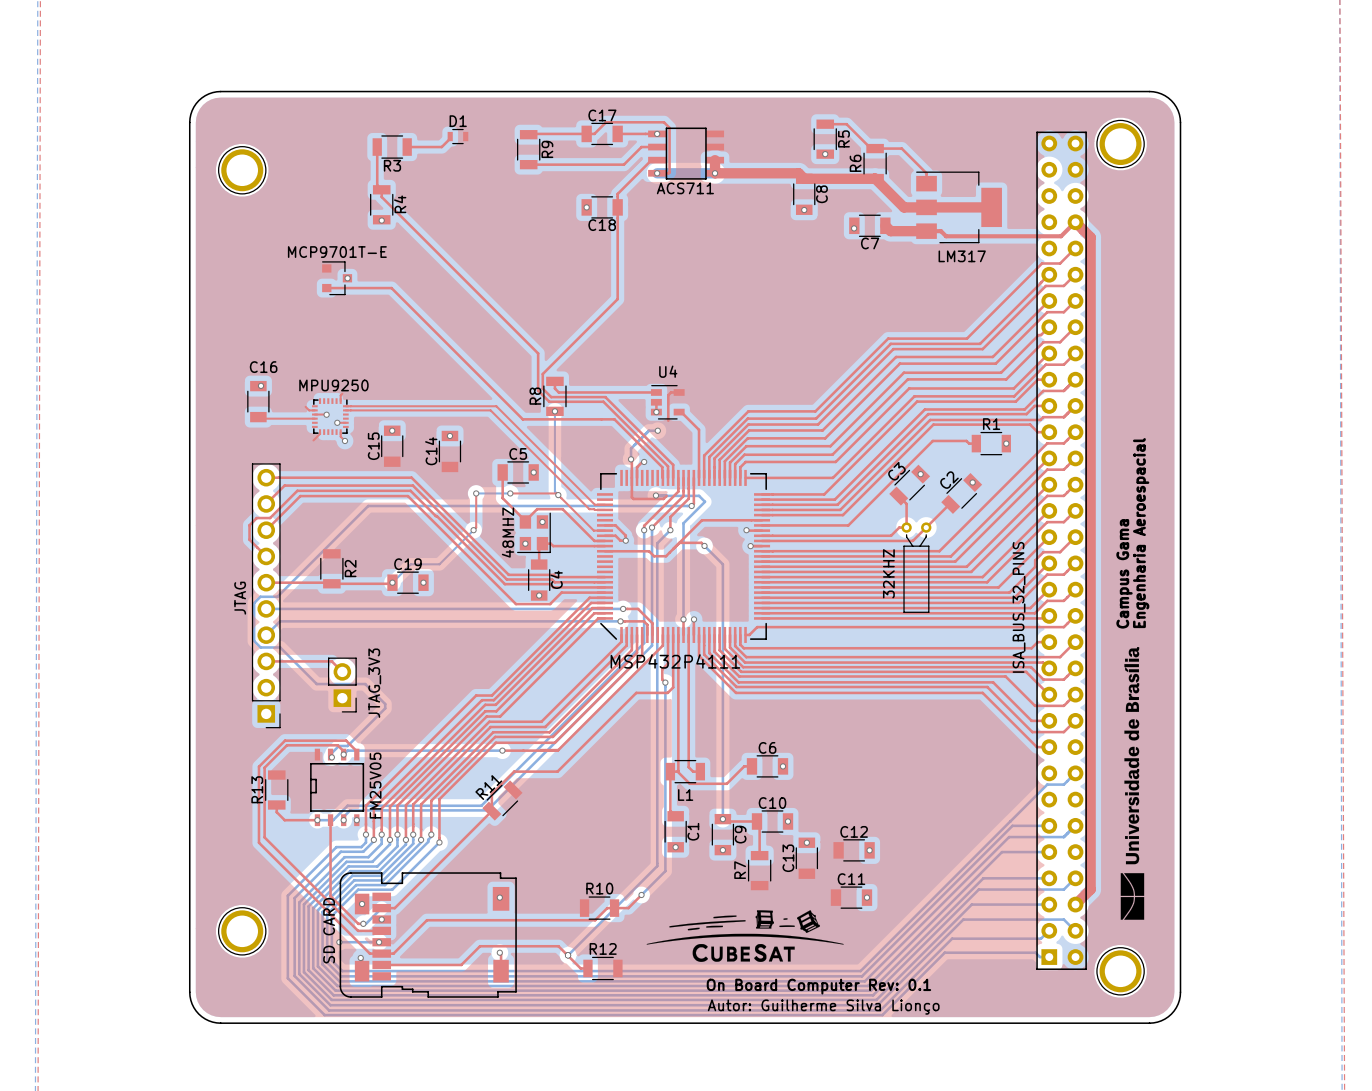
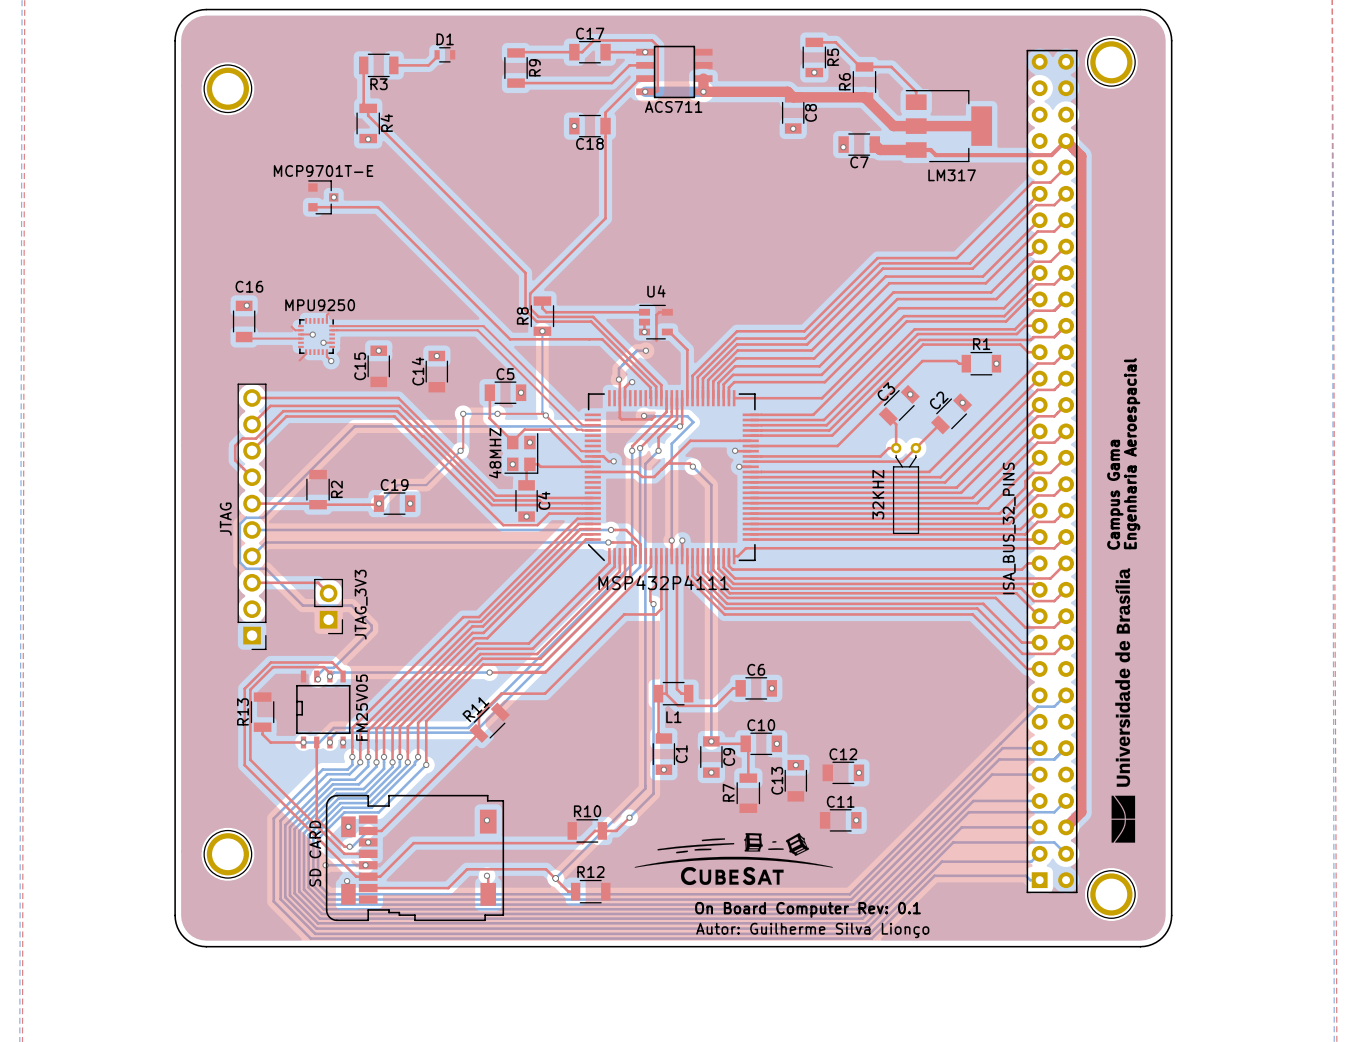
top track: (605, 525) (615, 525) (625, 535) (625, 540) -> none

